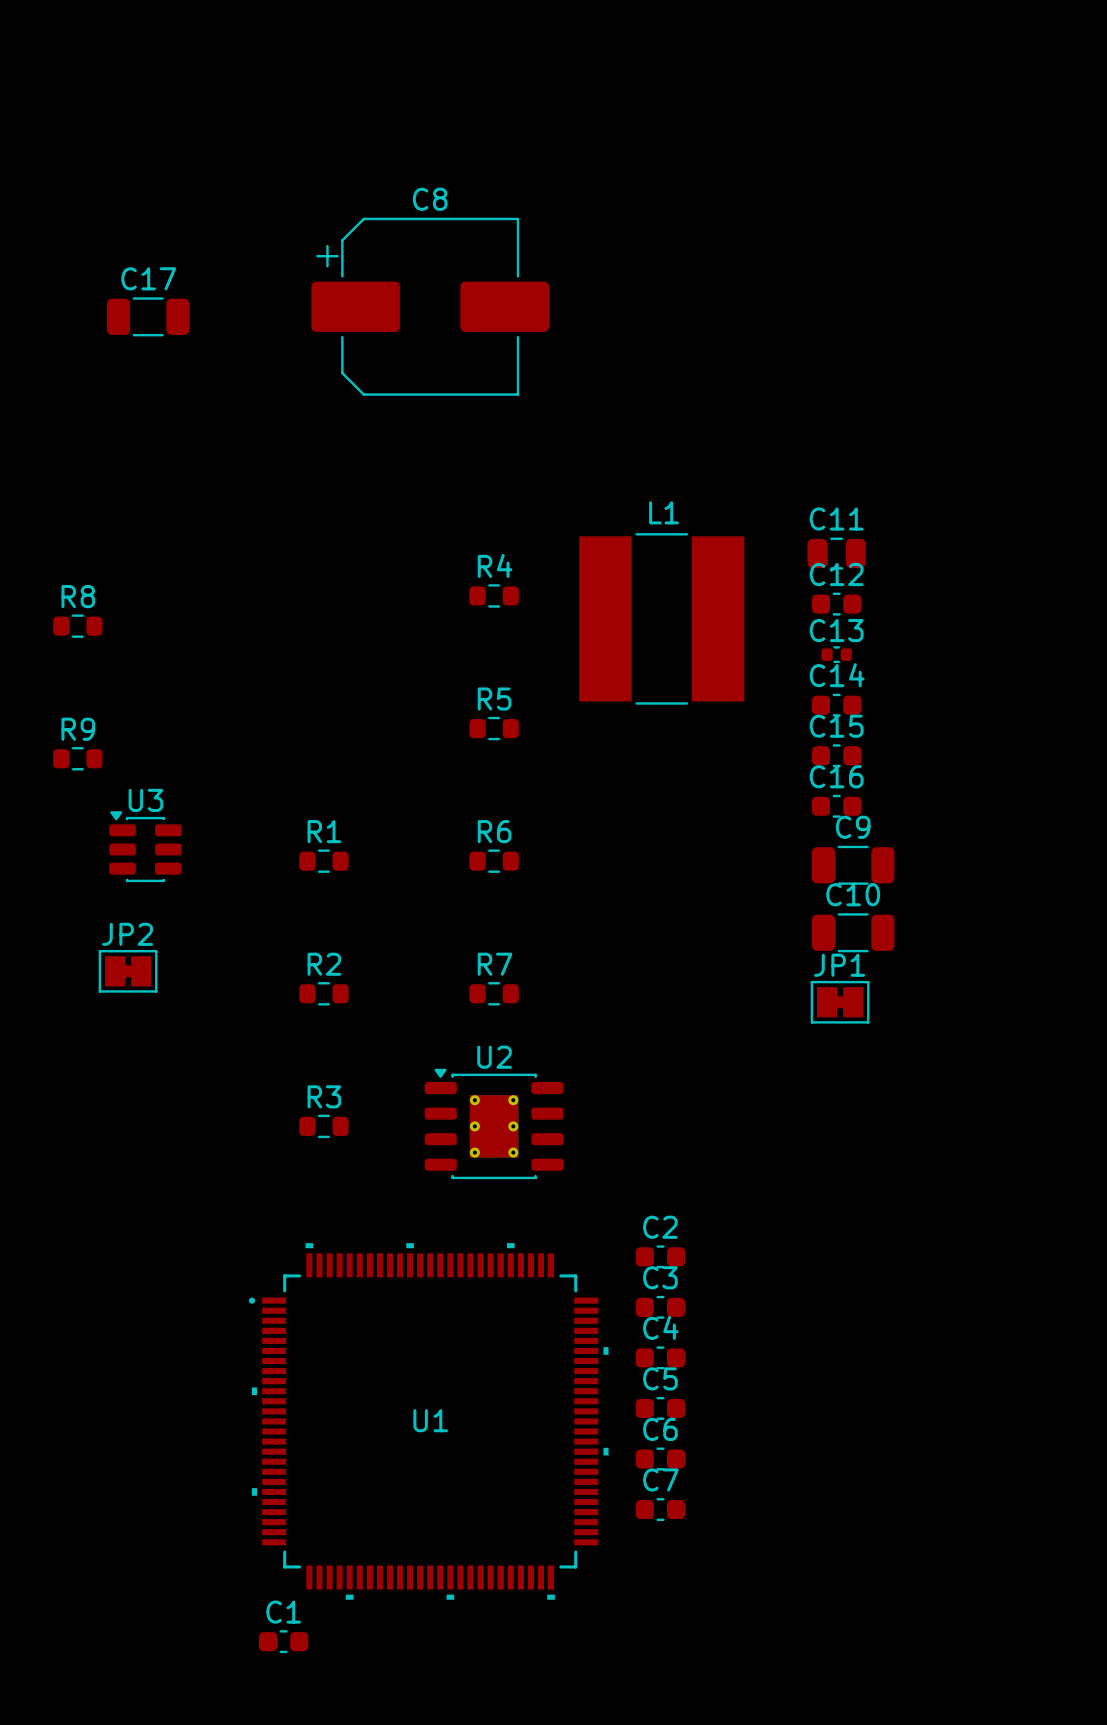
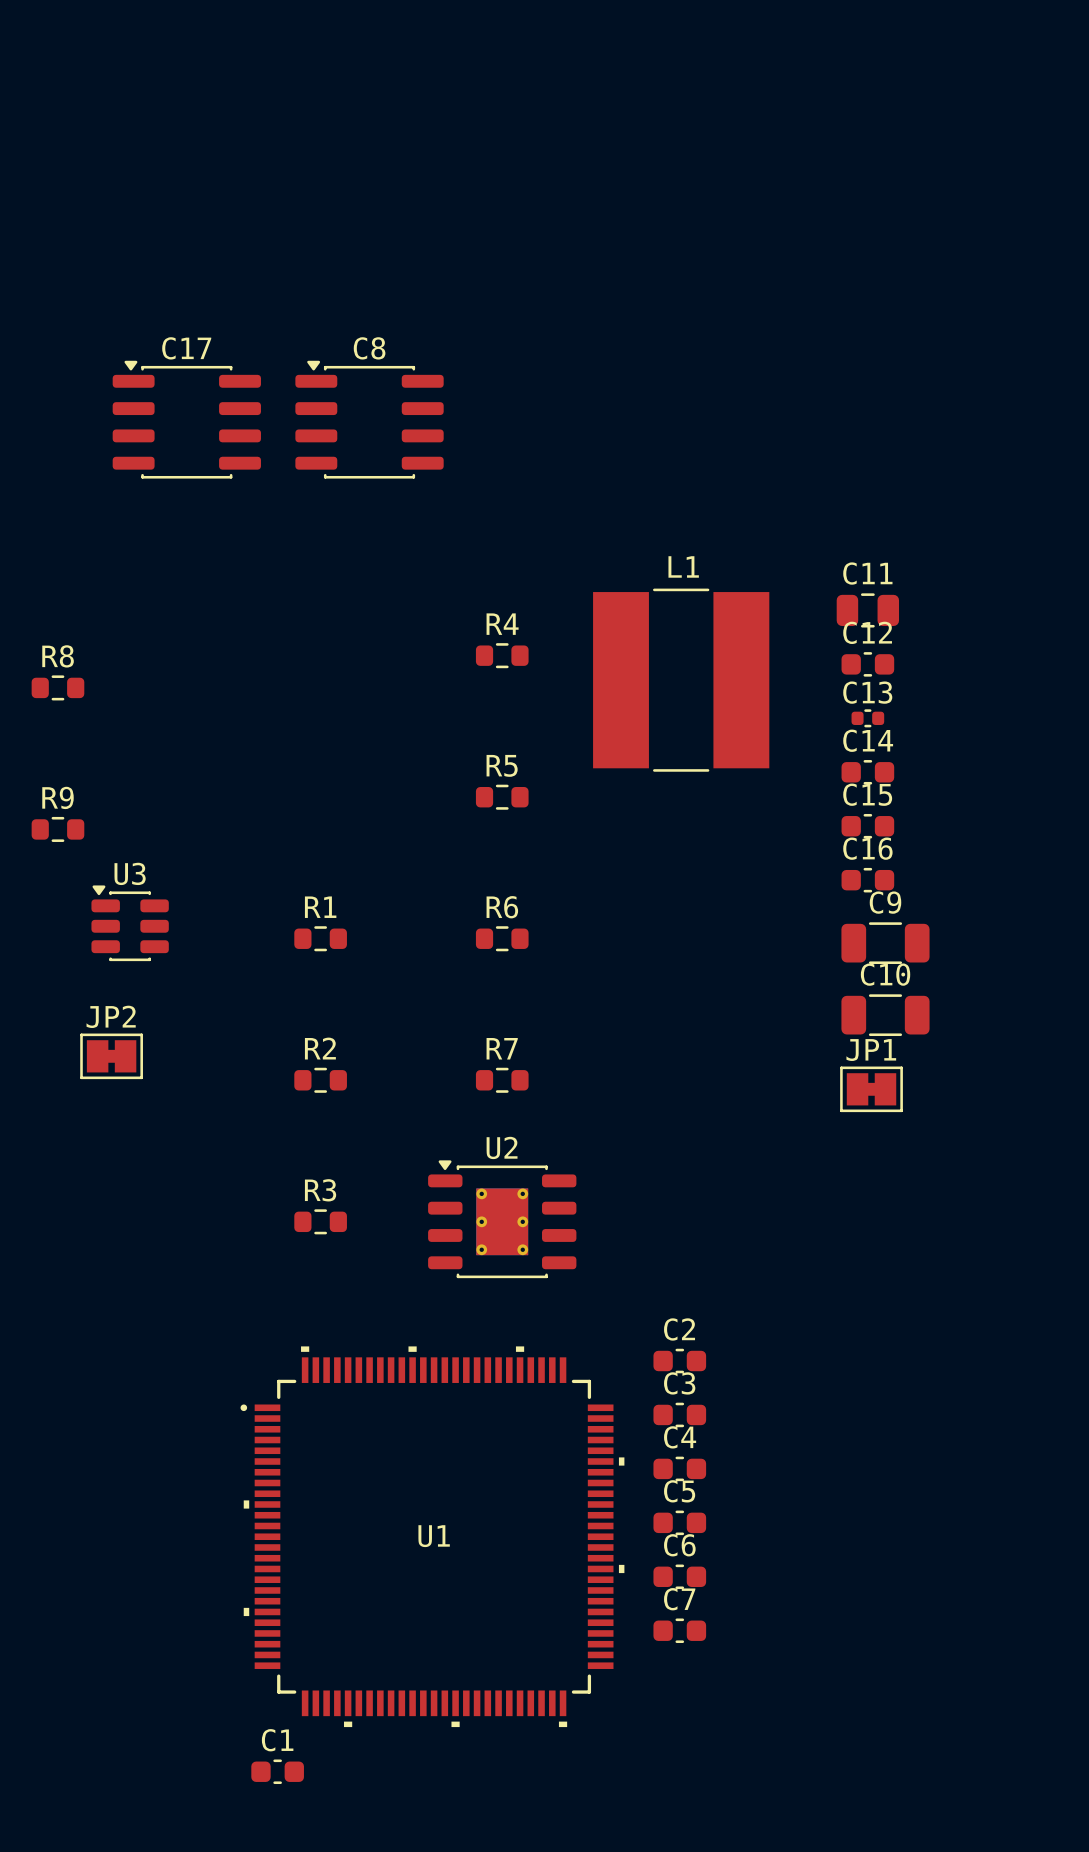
C8 name position: C8 (430, 199) -> C8 (369, 348)
C8 footprint: [311, 217, 549, 396] -> [295, 360, 444, 479]
C17 footprint: [106, 297, 190, 337] -> [112, 360, 261, 479]

